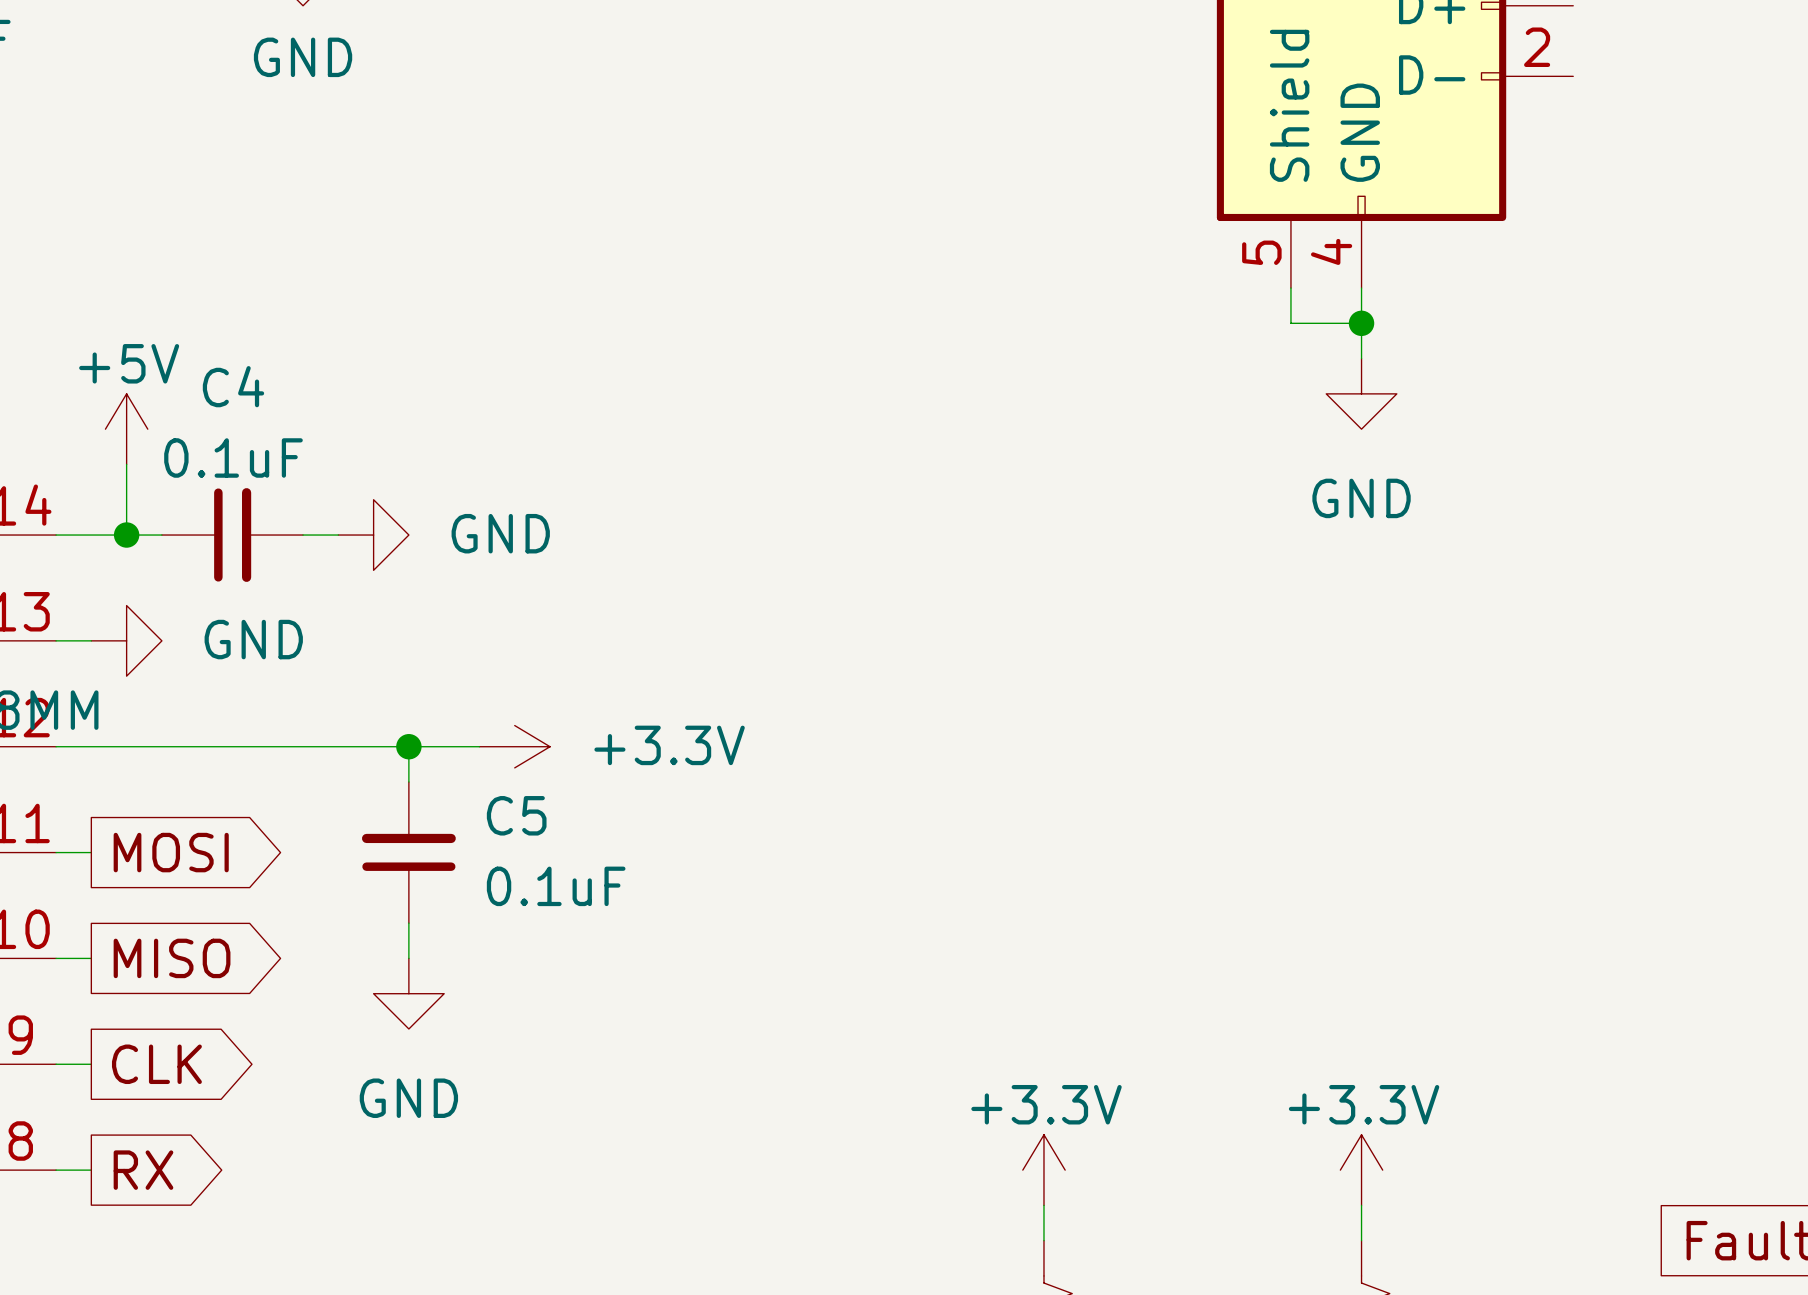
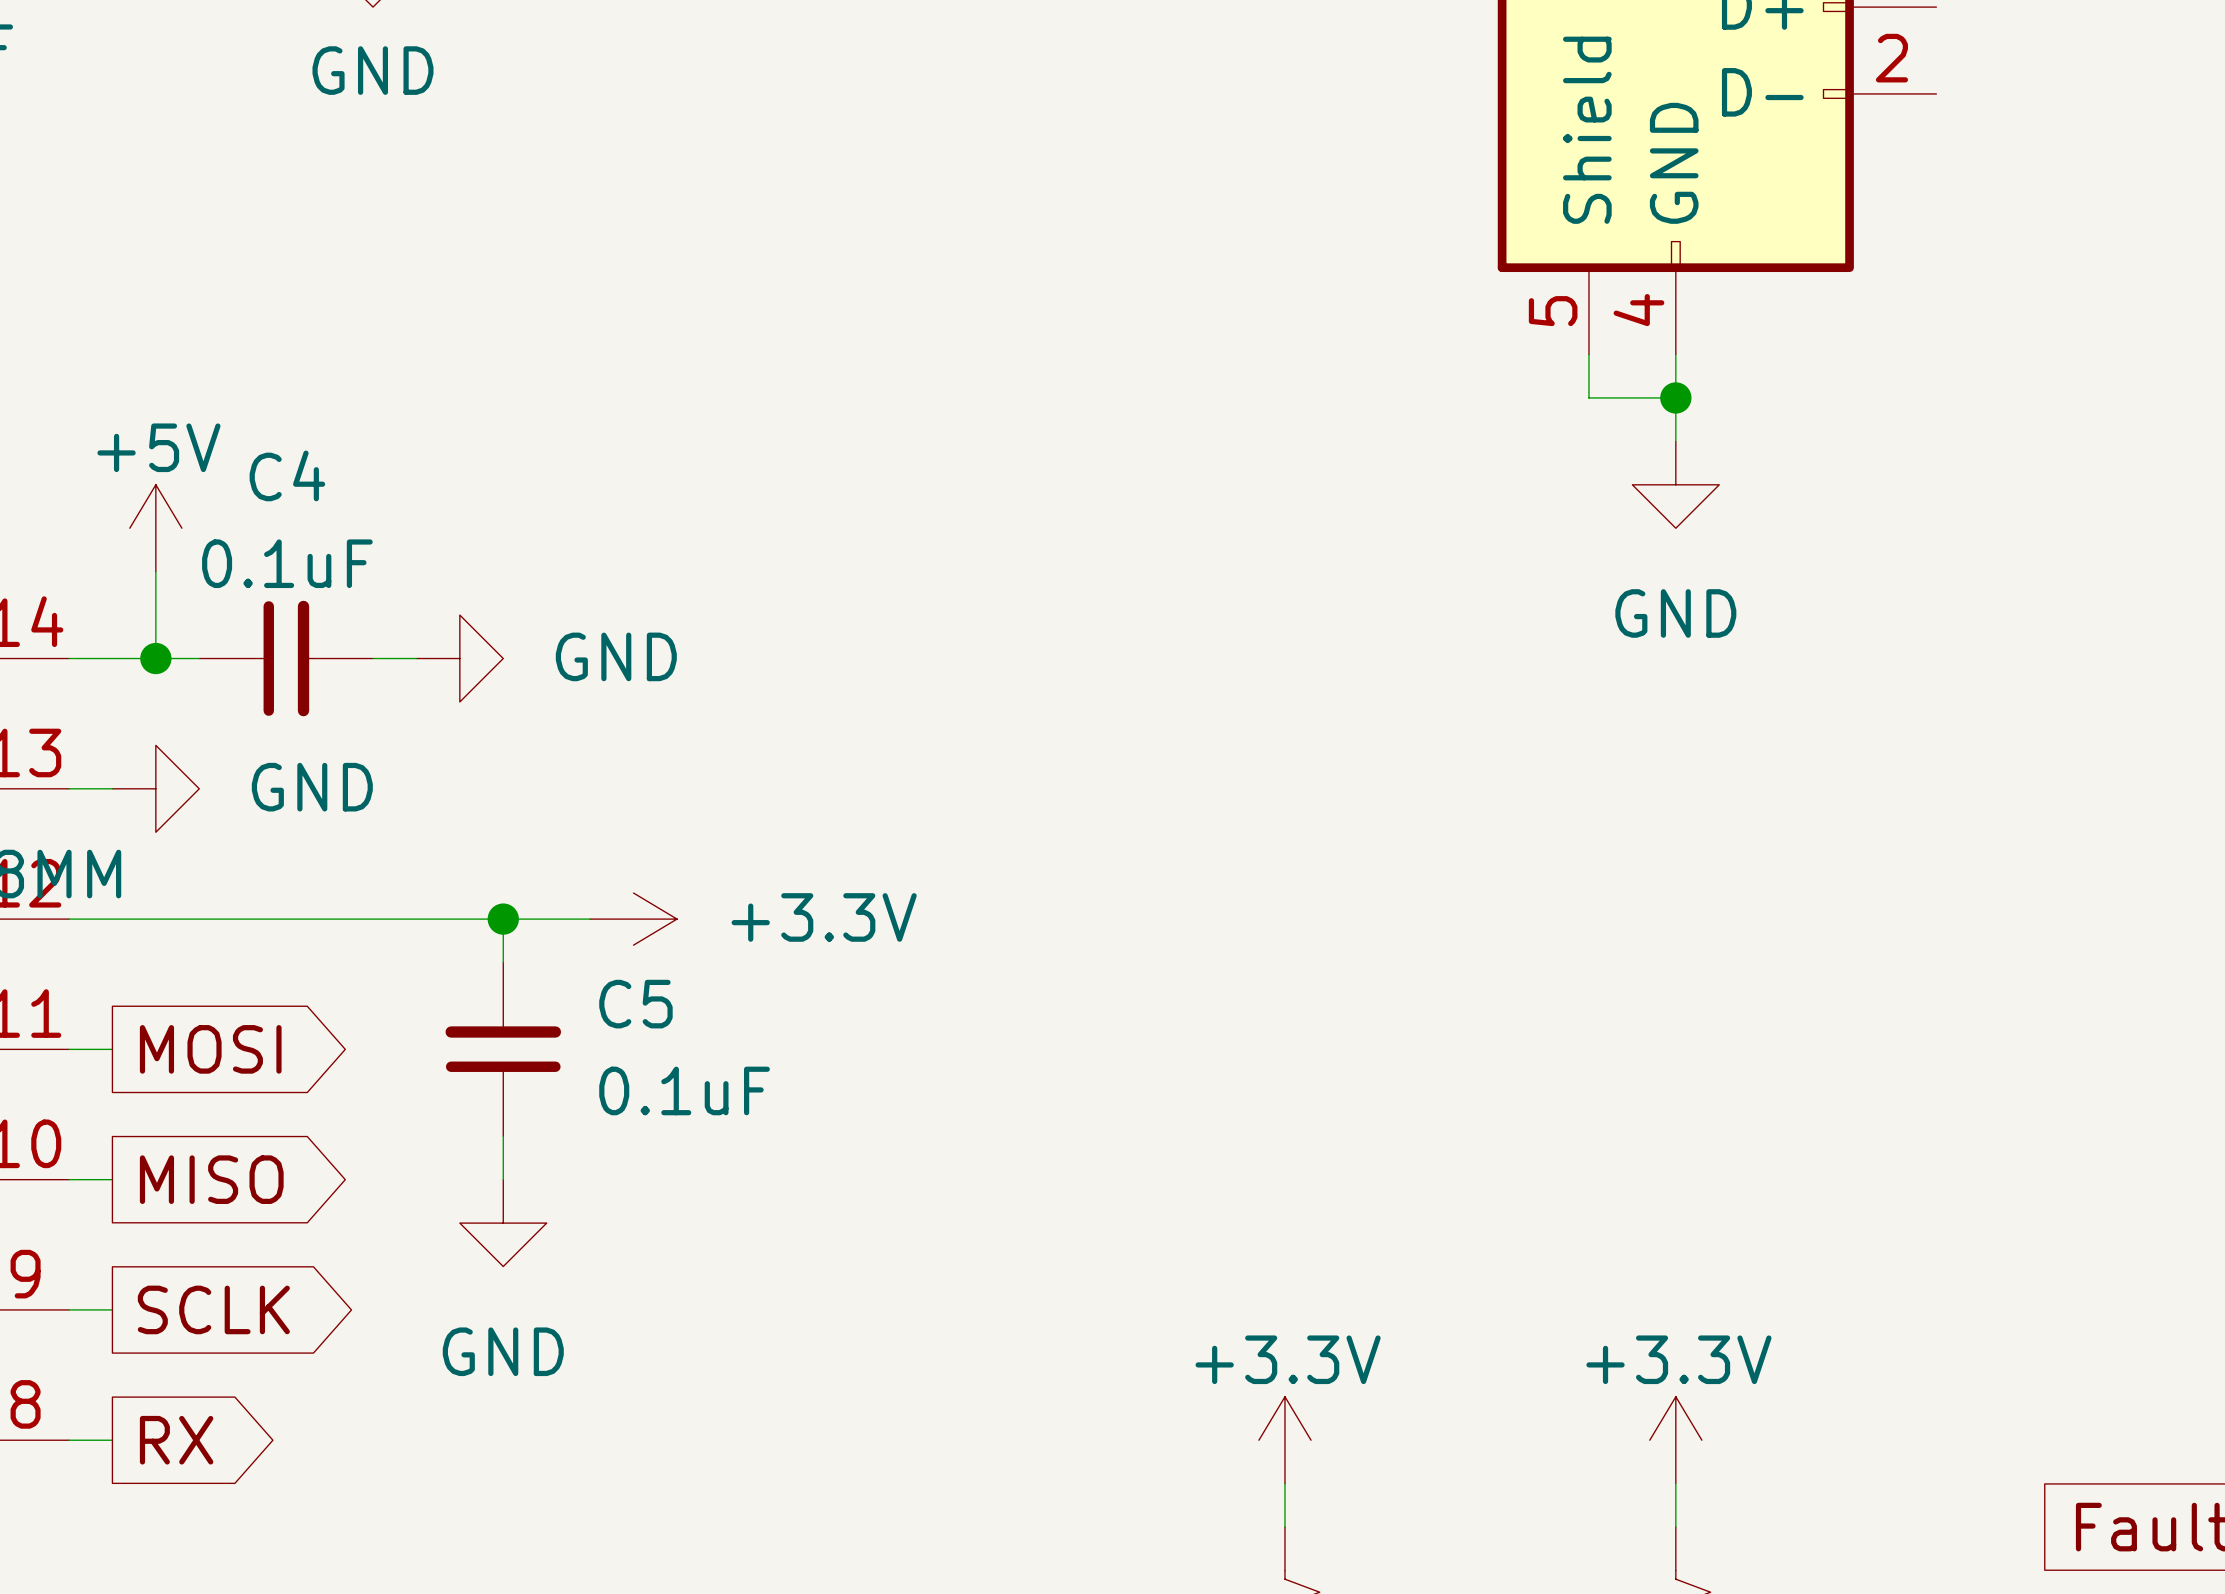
global label: CLK (156, 1064) -> SCLK (213, 1309)

